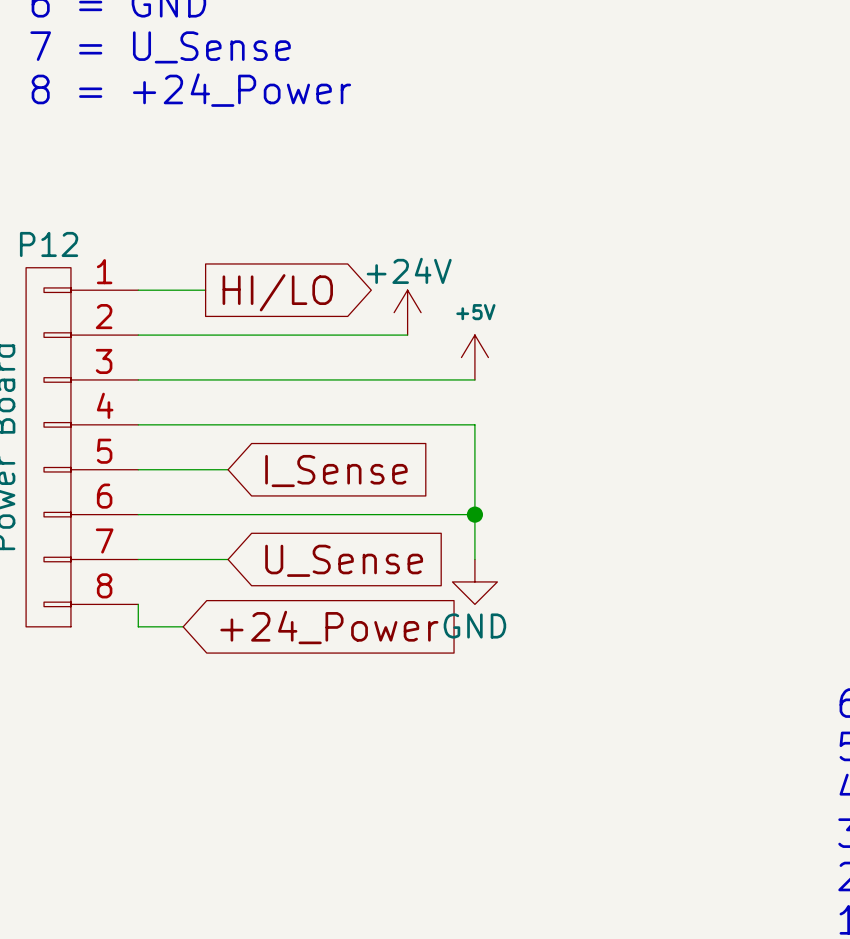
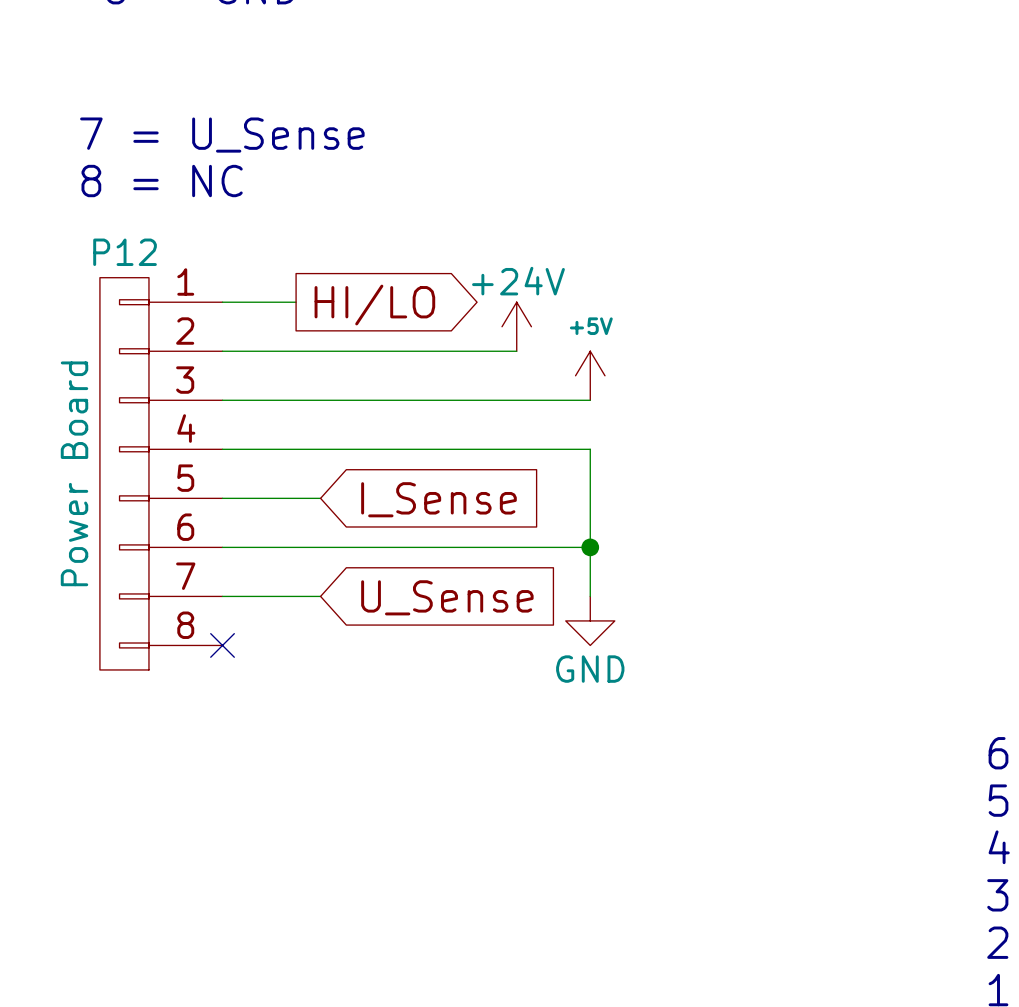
text position: 7 = U_Sense (160, 47) -> 7 = U_Sense (222, 135)
text: 8 = +24_Power (191, 90) -> none
text: none -> 8 = NC (162, 181)
wire: (138, 604) (138, 626) (183, 626) -> none
no-connect mark: none -> (222, 645)
global label: +24_Power (329, 627) -> none

